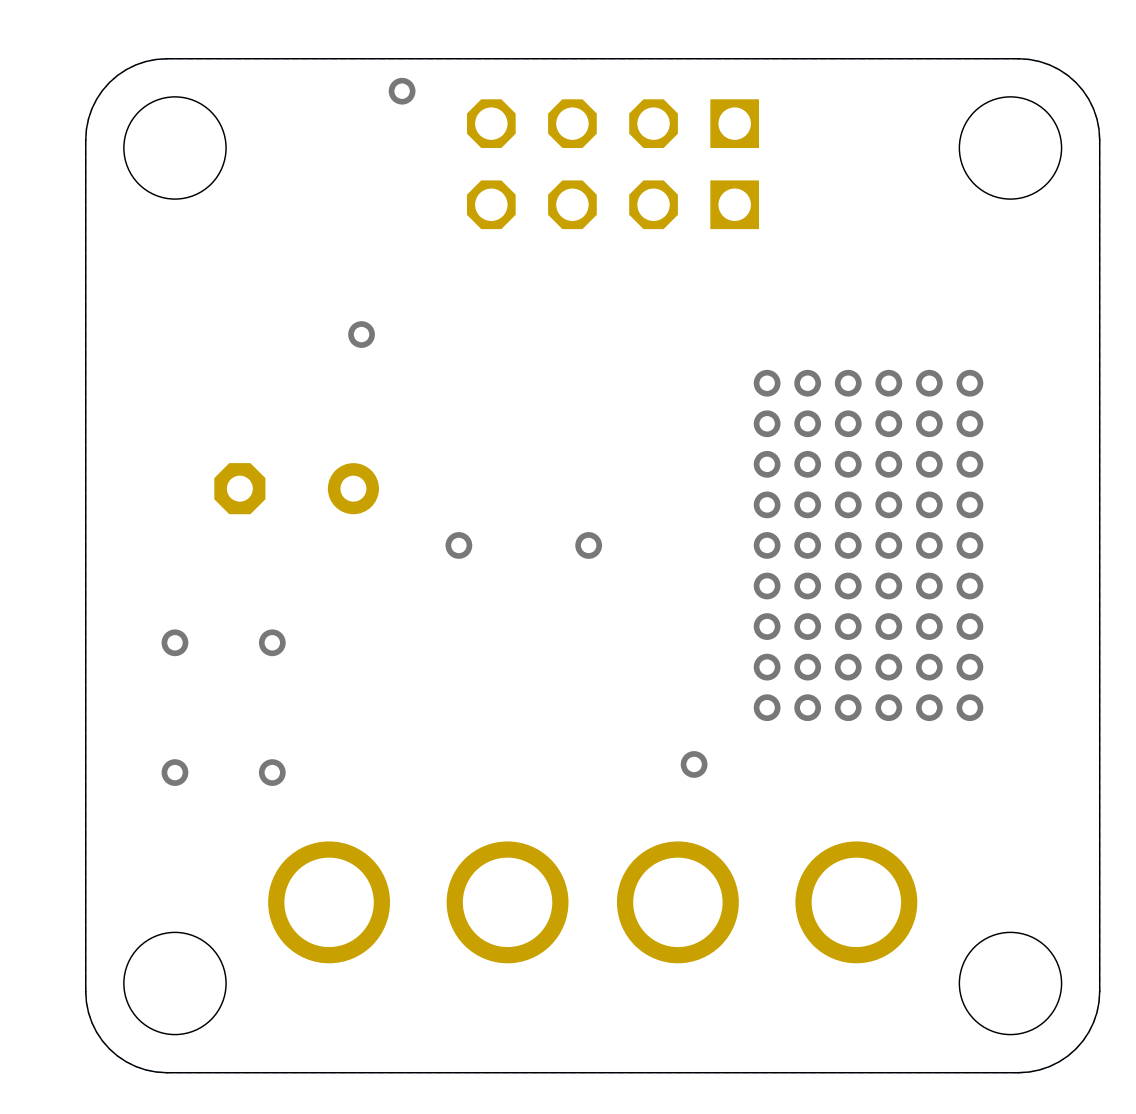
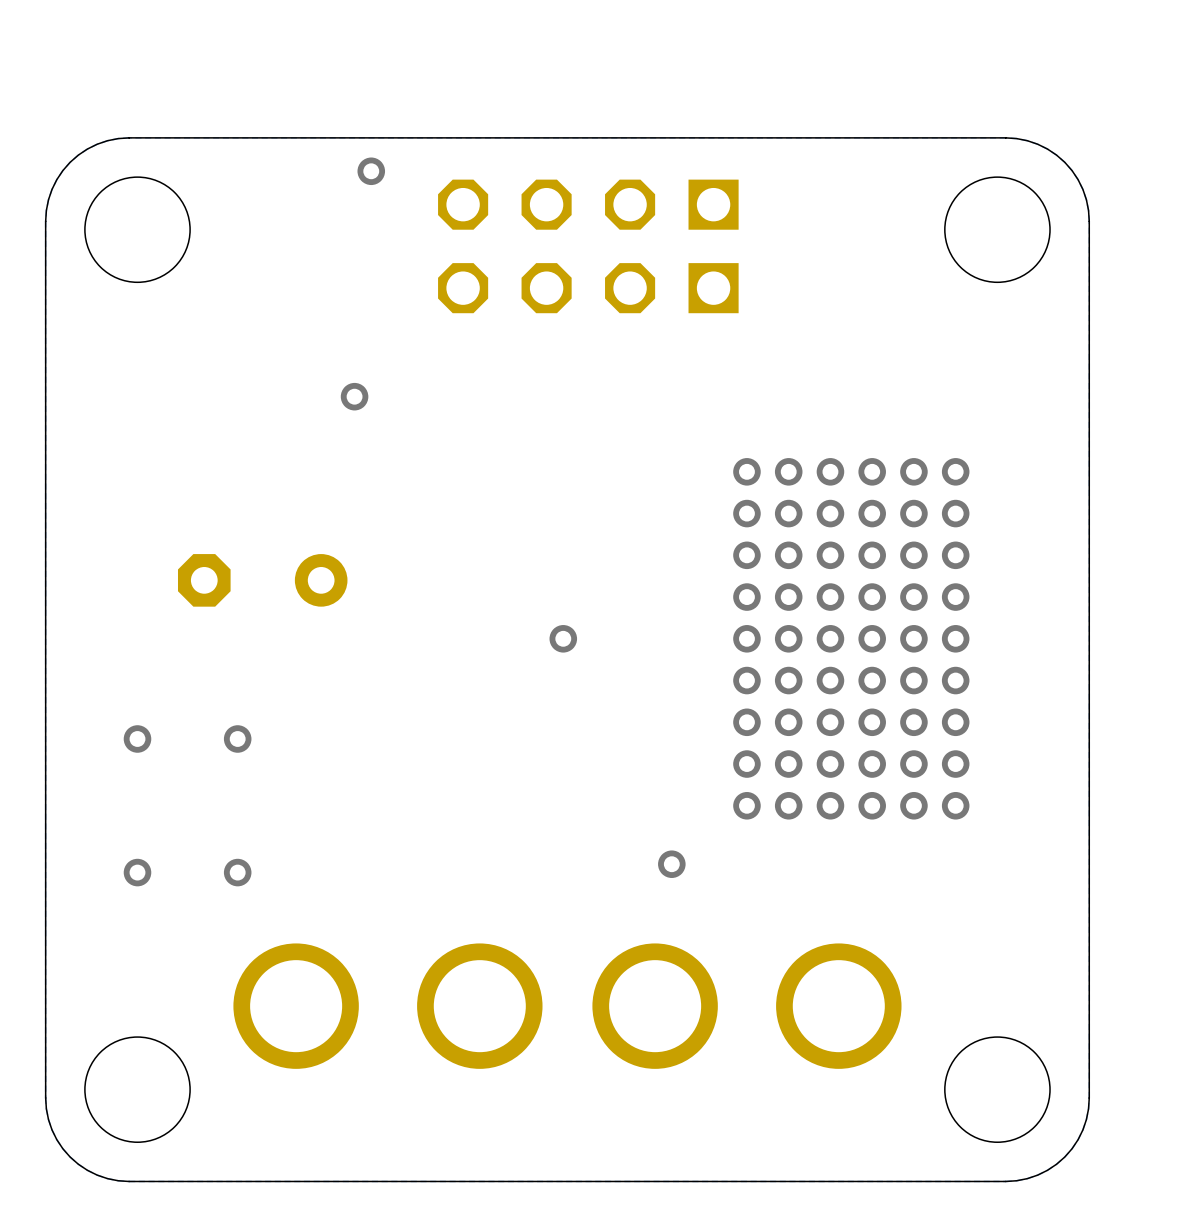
via position: (361, 334) -> (354, 396)
via: (458, 545) -> none

